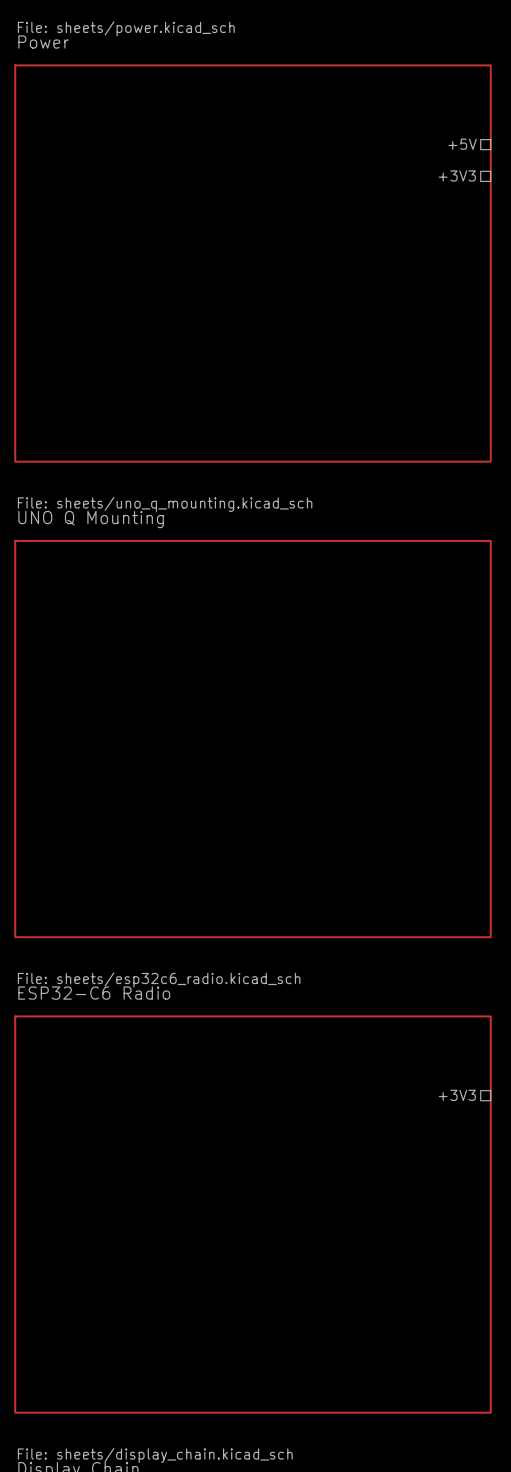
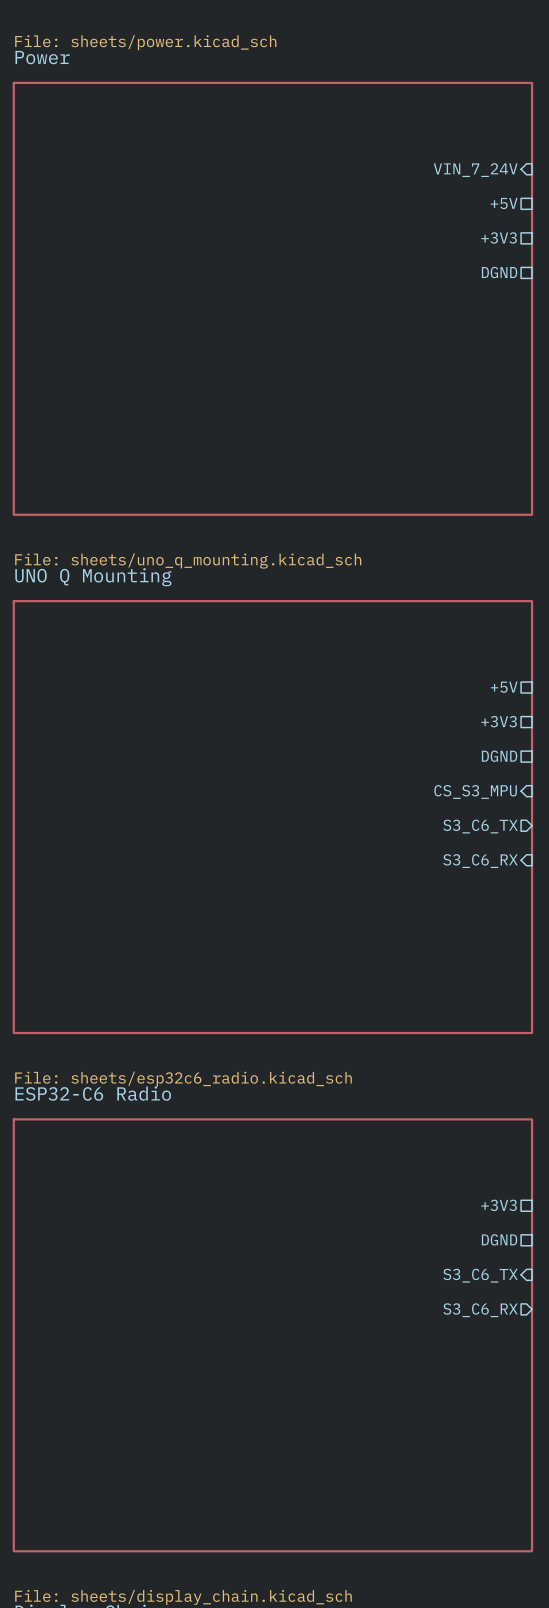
sheet pin shape: passive (462, 144) -> input (475, 170)
sheet pin: +5V (462, 144) -> VIN_7_24V (475, 170)
sheet pin: +3V3 (457, 175) -> +5V (504, 203)
sheet pin: none -> +3V3 (499, 237)
sheet pin: none -> DGND (499, 272)
sheet pin: none -> +5V (504, 687)
sheet pin: none -> +3V3 (499, 721)
sheet pin: none -> DGND (499, 756)
sheet pin: none -> CS_S3_MPU (475, 791)
sheet pin: none -> S3_C6_TX (480, 826)
sheet pin: none -> S3_C6_RX (480, 861)
sheet pin: none -> DGND (499, 1239)
sheet pin: none -> S3_C6_TX (480, 1275)
sheet pin: none -> S3_C6_RX (480, 1310)

